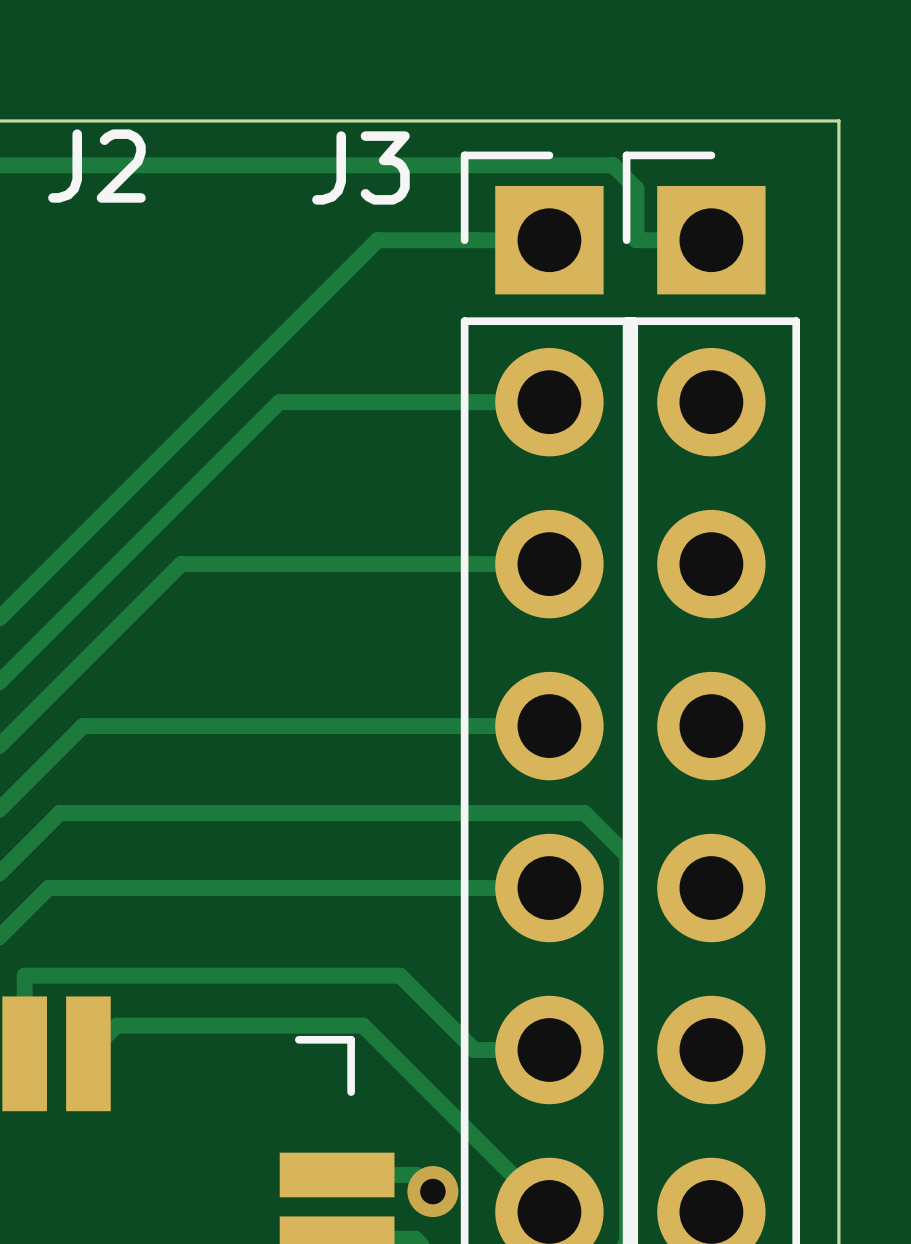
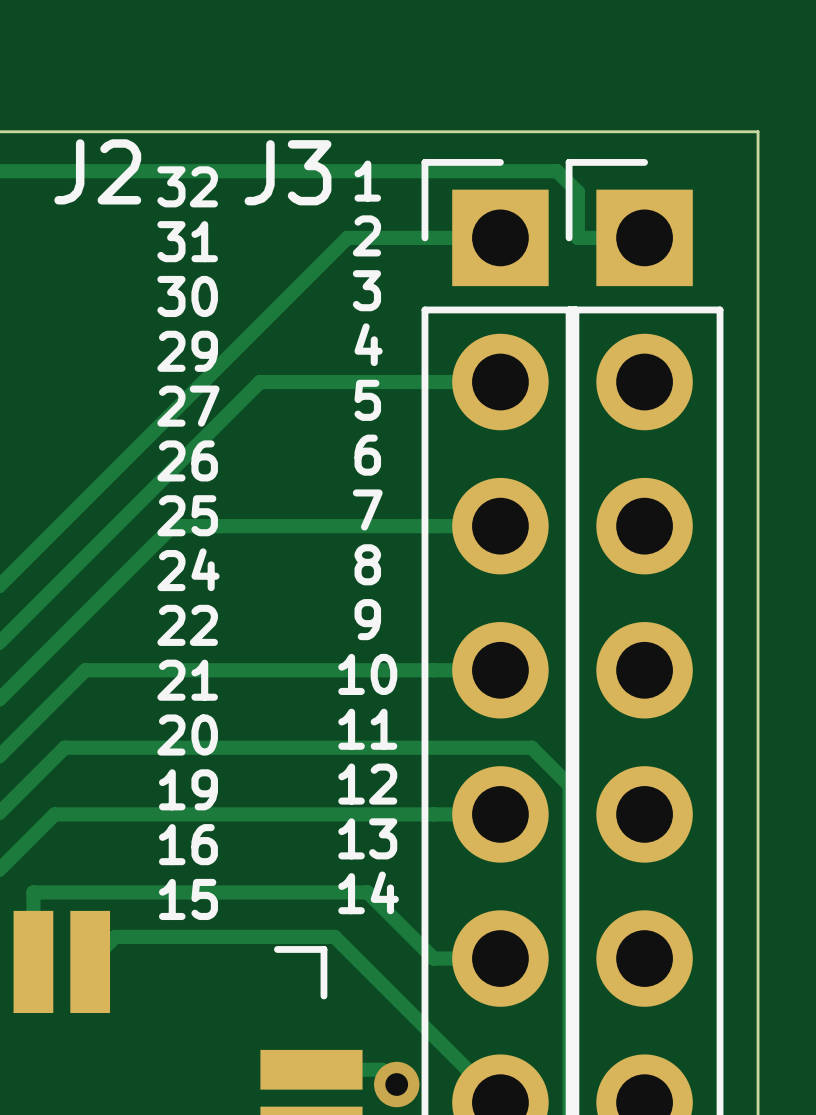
J3 name position: J3 (360, 167) -> J3 (288, 172)
text: none -> 1 (367, 181)
text: none -> 32 (187, 186)
text: none -> 2 (366, 235)
text: none -> 31 (187, 241)
text: none -> 3 (366, 290)
text: none -> 30 (187, 296)
text: none -> 4 (368, 344)
text: none -> 29 (187, 351)
text: none -> 5 (367, 400)
text: none -> 27 (188, 406)
text: none -> 6 (367, 455)
text: none -> 26 (187, 460)
text: none -> 7 (367, 509)
text: none -> 25 (187, 515)
text: none -> 8 (367, 564)
text: none -> 24 (188, 569)
text: none -> 9 (367, 619)
text: none -> 22 (187, 625)
text: none -> 10 (367, 674)
text: none -> 21 (187, 680)
text: none -> 11 (367, 729)
text: none -> 20 (187, 735)
text: none -> 12 (367, 784)
text: none -> 19 (188, 789)
text: none -> 13 (367, 838)
text: none -> 16 (188, 844)
text: none -> 14 (368, 892)
text: none -> 15 (188, 899)

